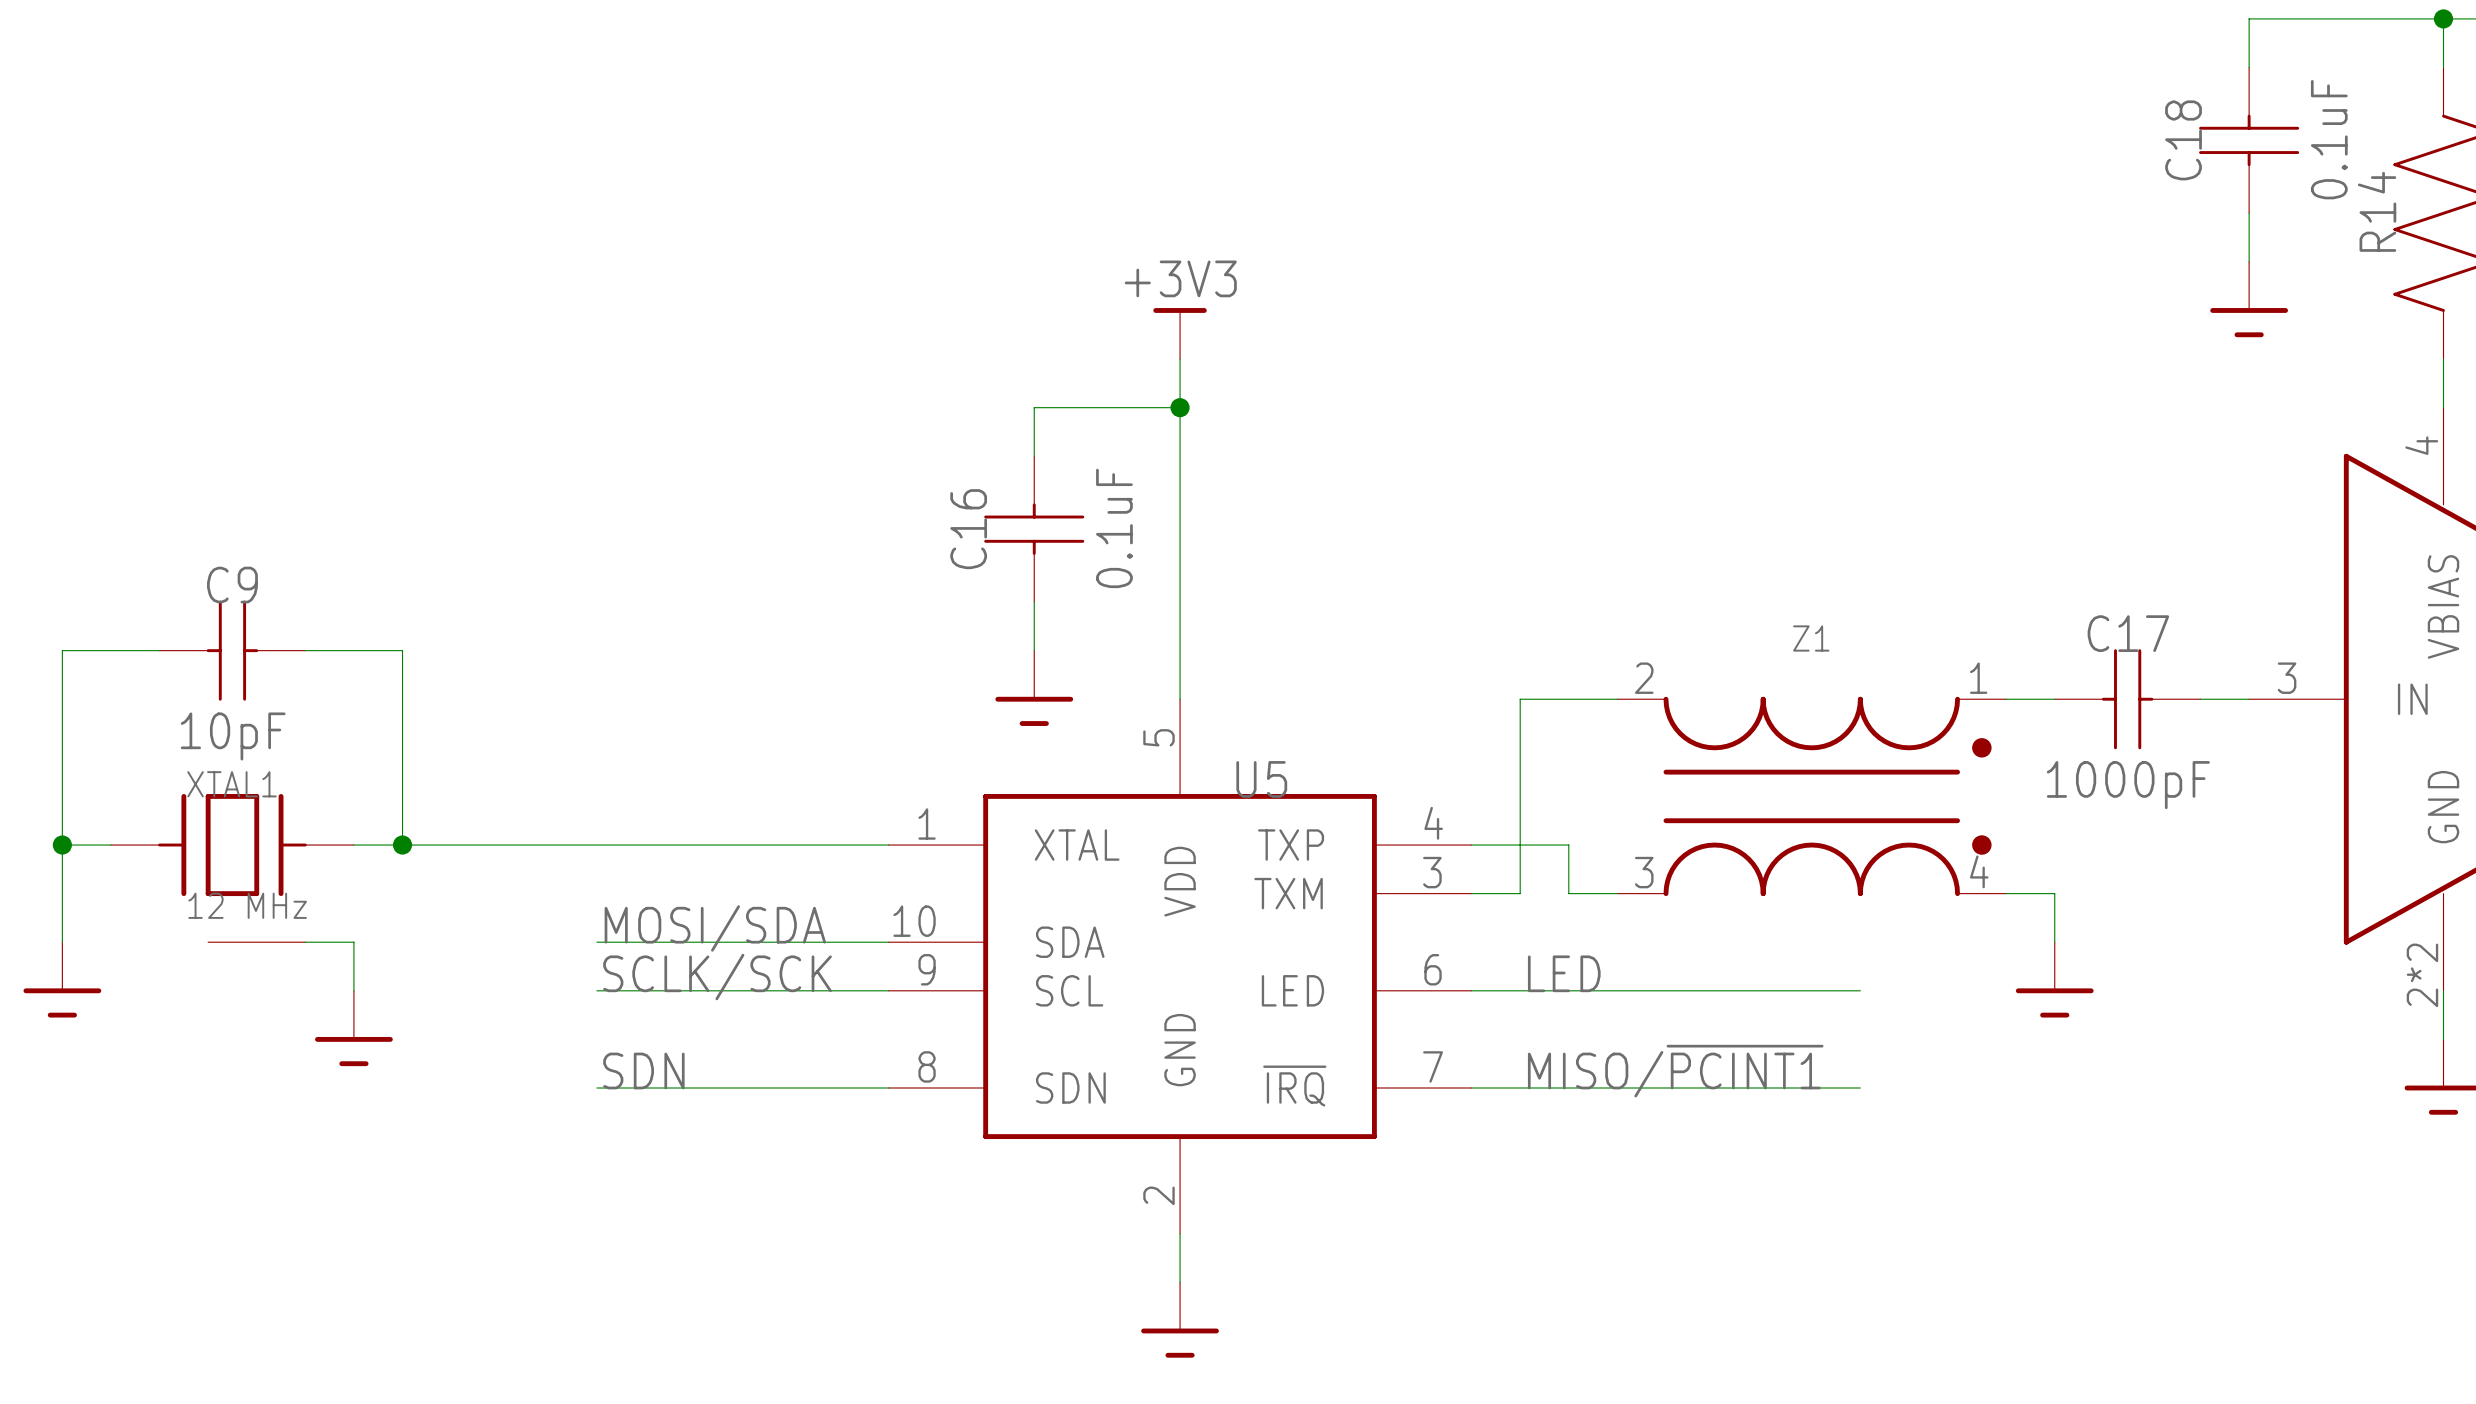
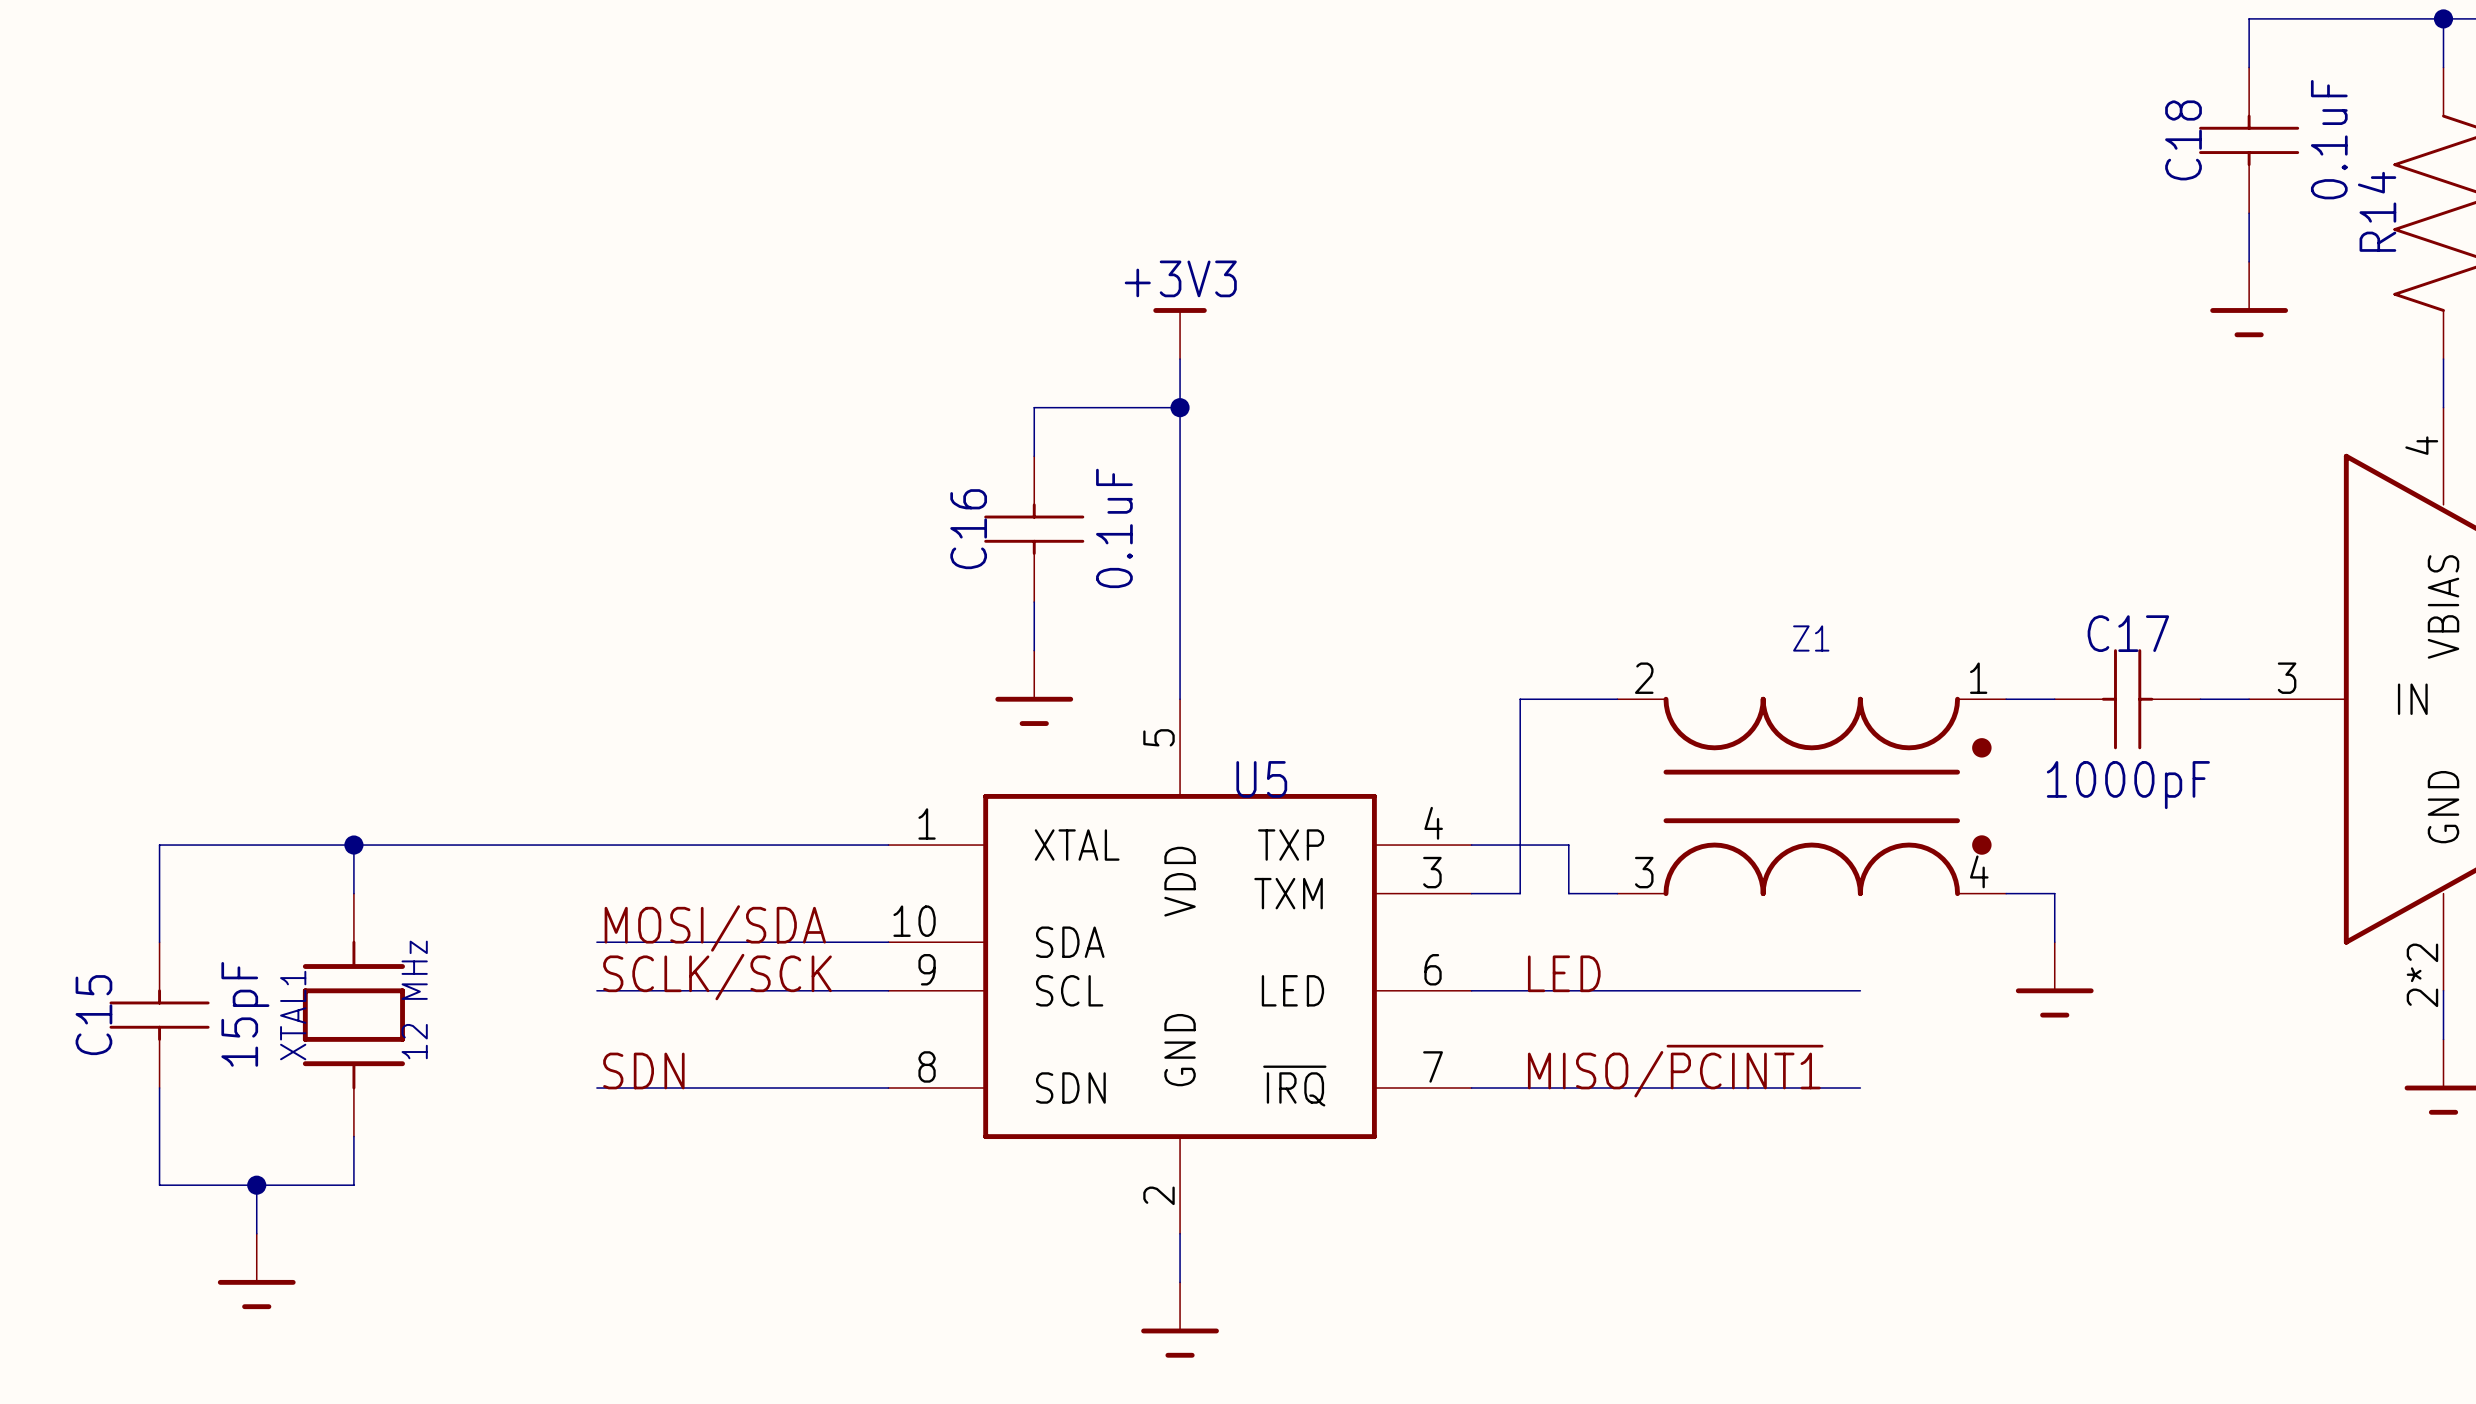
wire: (159, 650) (62, 650) (62, 942) -> none
C9: 10pF (232, 650) -> none
wire: (305, 650) (402, 650) (402, 845) -> none
XTAL1 name position: XTAL1 (231, 784) -> XTAL1 (293, 1015)
XTAL1 symbol: [110, 794, 354, 943] -> [302, 893, 405, 1137]
wire: (62, 845) (110, 845) -> none
junction: (62, 845) -> none
junction position: (402, 845) -> (353, 845)
wire: none -> (353, 893) (353, 845) (159, 845) (159, 942)
XTAL1 value position: 12 MHz (247, 905) -> 12 MHz (414, 999)
wire: (305, 942) (353, 942) (353, 990) -> none
power symbol: (62, 979) -> none
C15: none -> 15pF (159, 1015)
power symbol: (353, 1028) -> none
wire: none -> (159, 1088) (159, 1185) (353, 1185) (353, 1136)
wire: none -> (256, 1185) (256, 1233)
junction: none -> (256, 1185)
power symbol: none -> (256, 1271)

